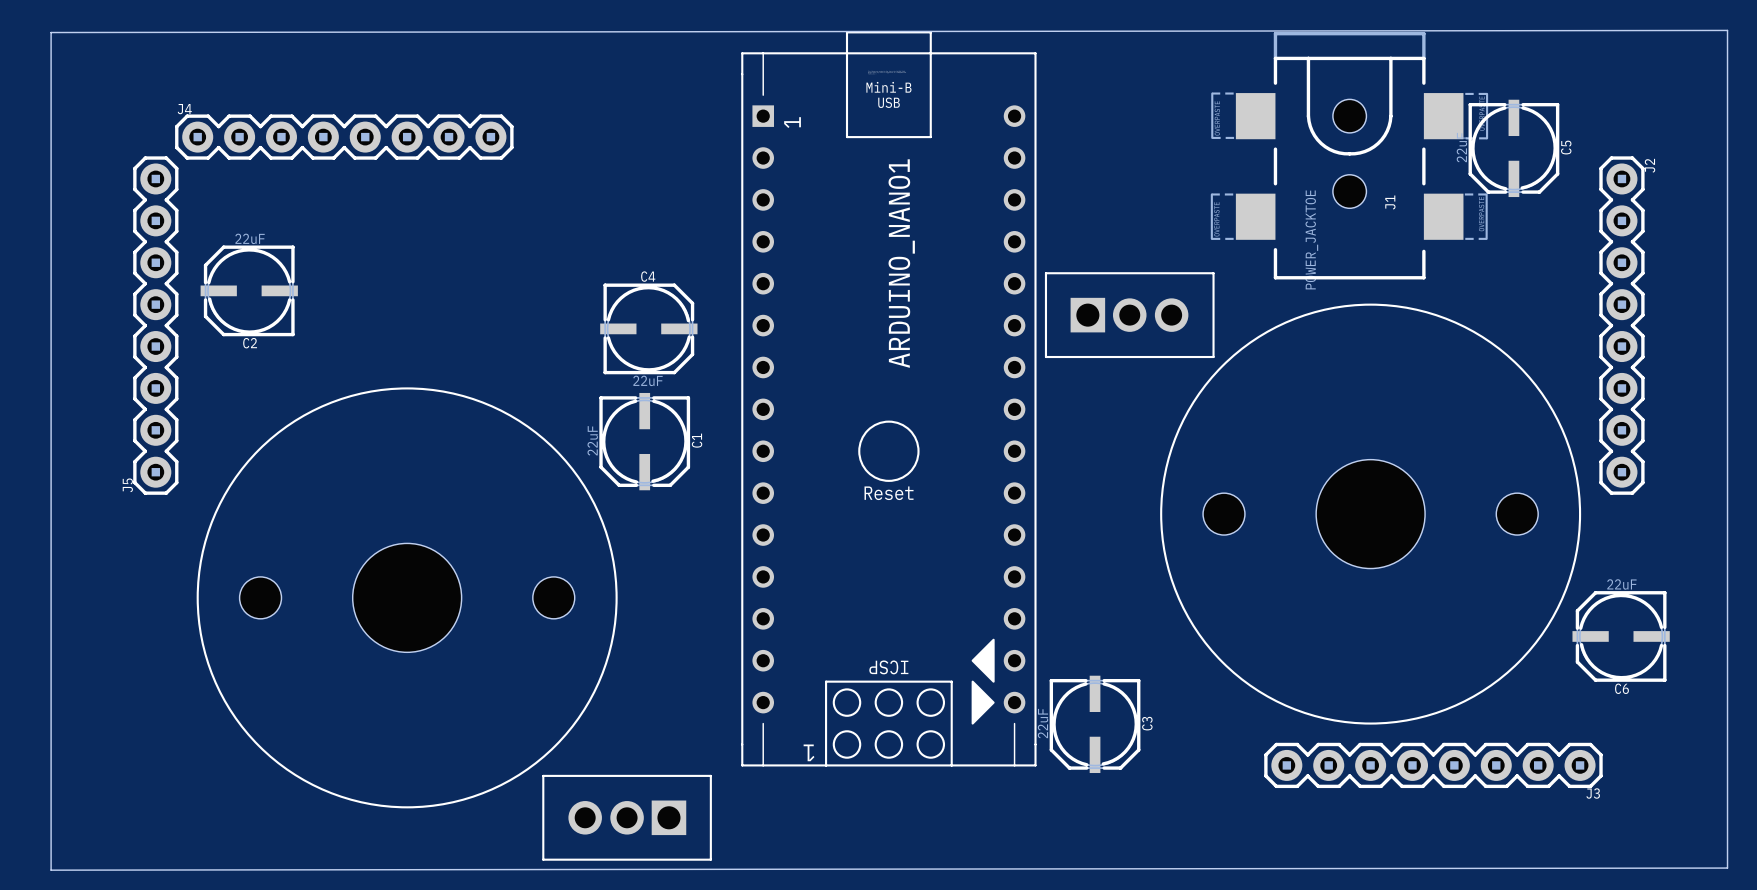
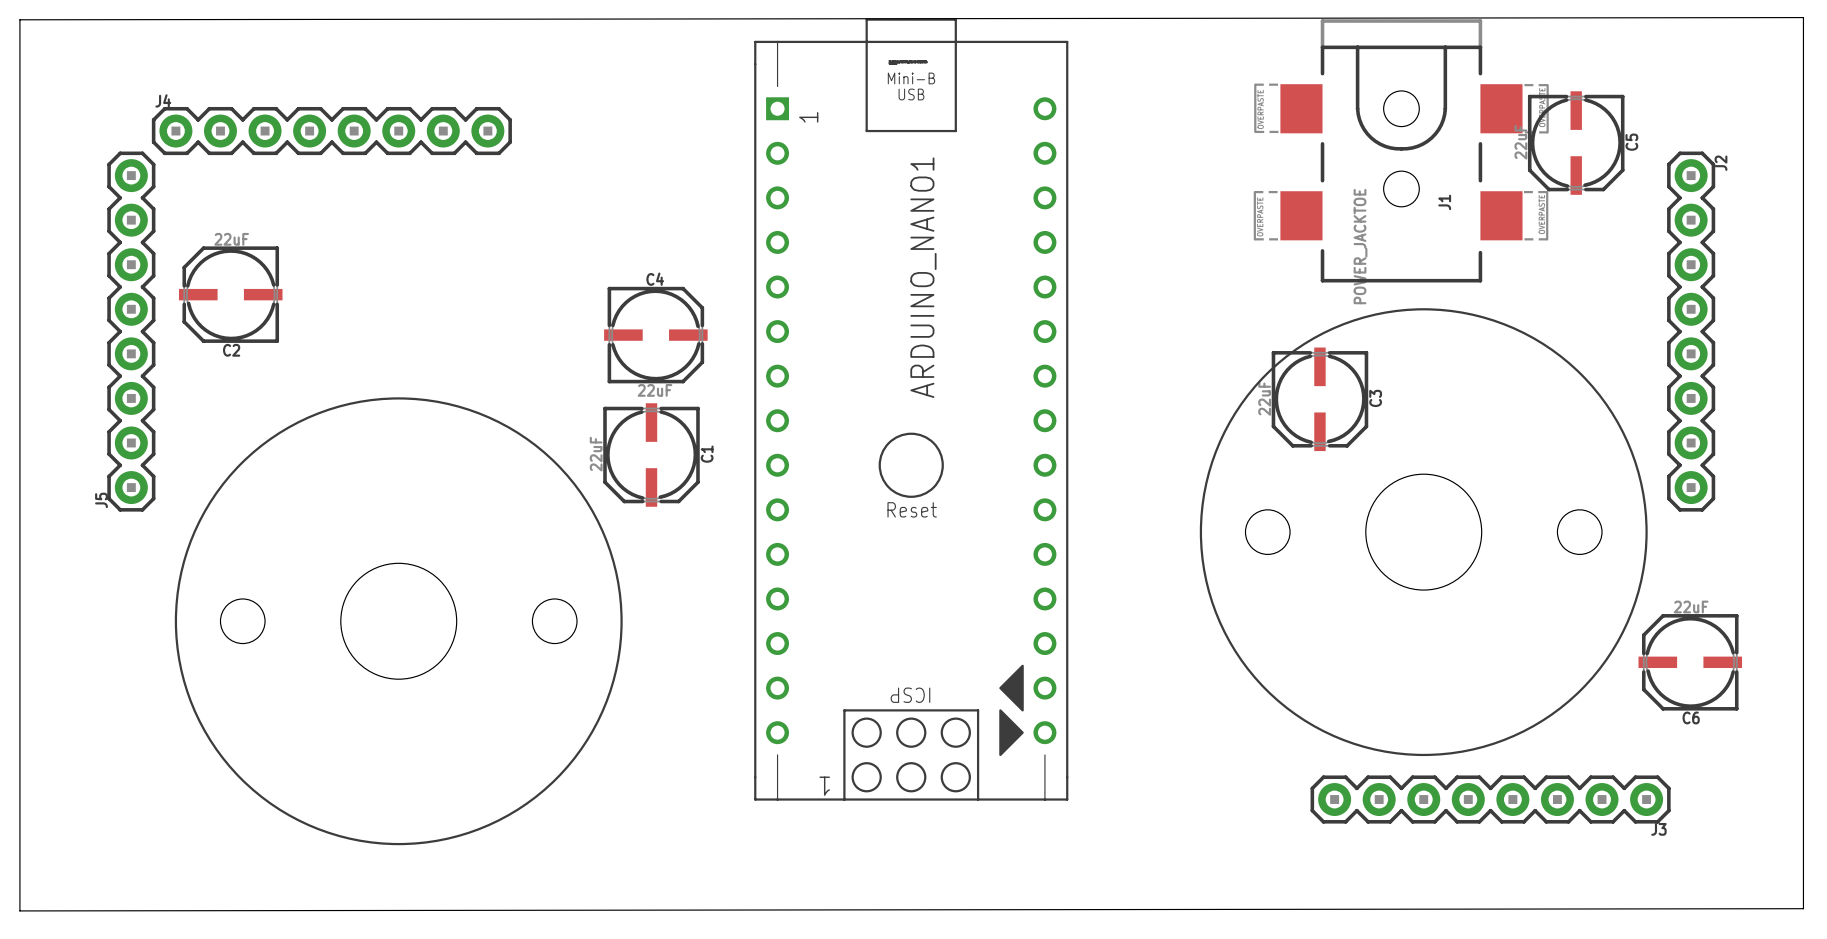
part: (1129, 315) -> none
C3 position: (1095, 724) -> (1319, 399)
part: (627, 817) -> none

